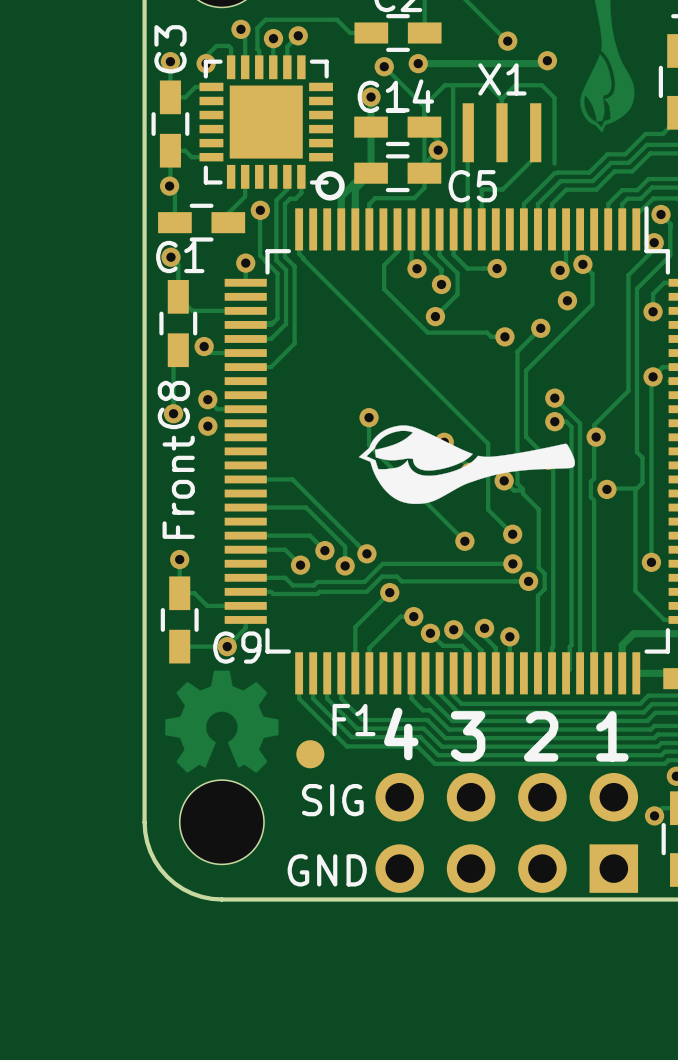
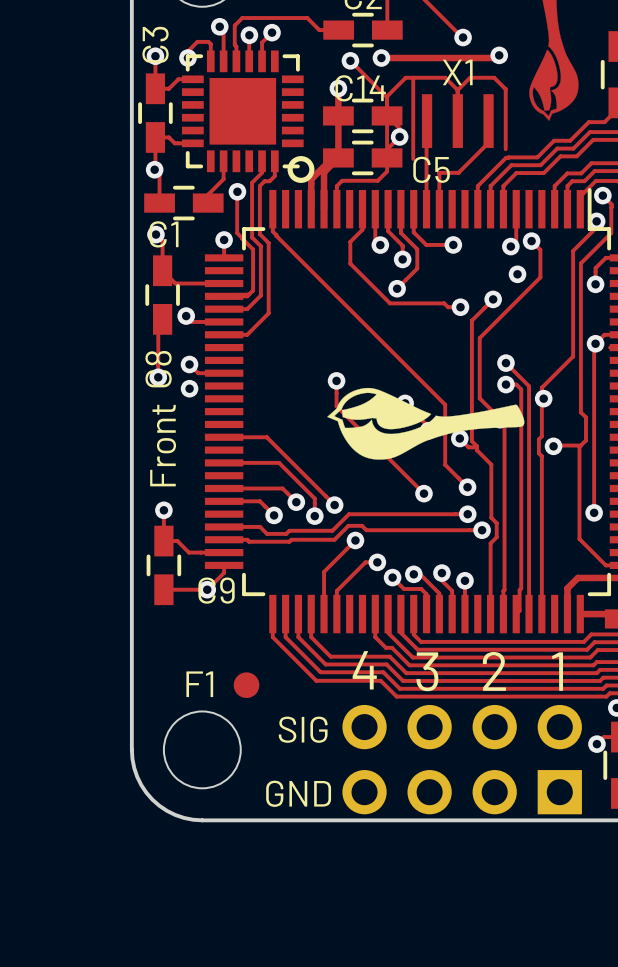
drawing: [165, 670, 279, 773] -> none
F1 name position: F1 (354, 720) -> F1 (199, 684)
F1 position: (310, 754) -> (246, 685)

